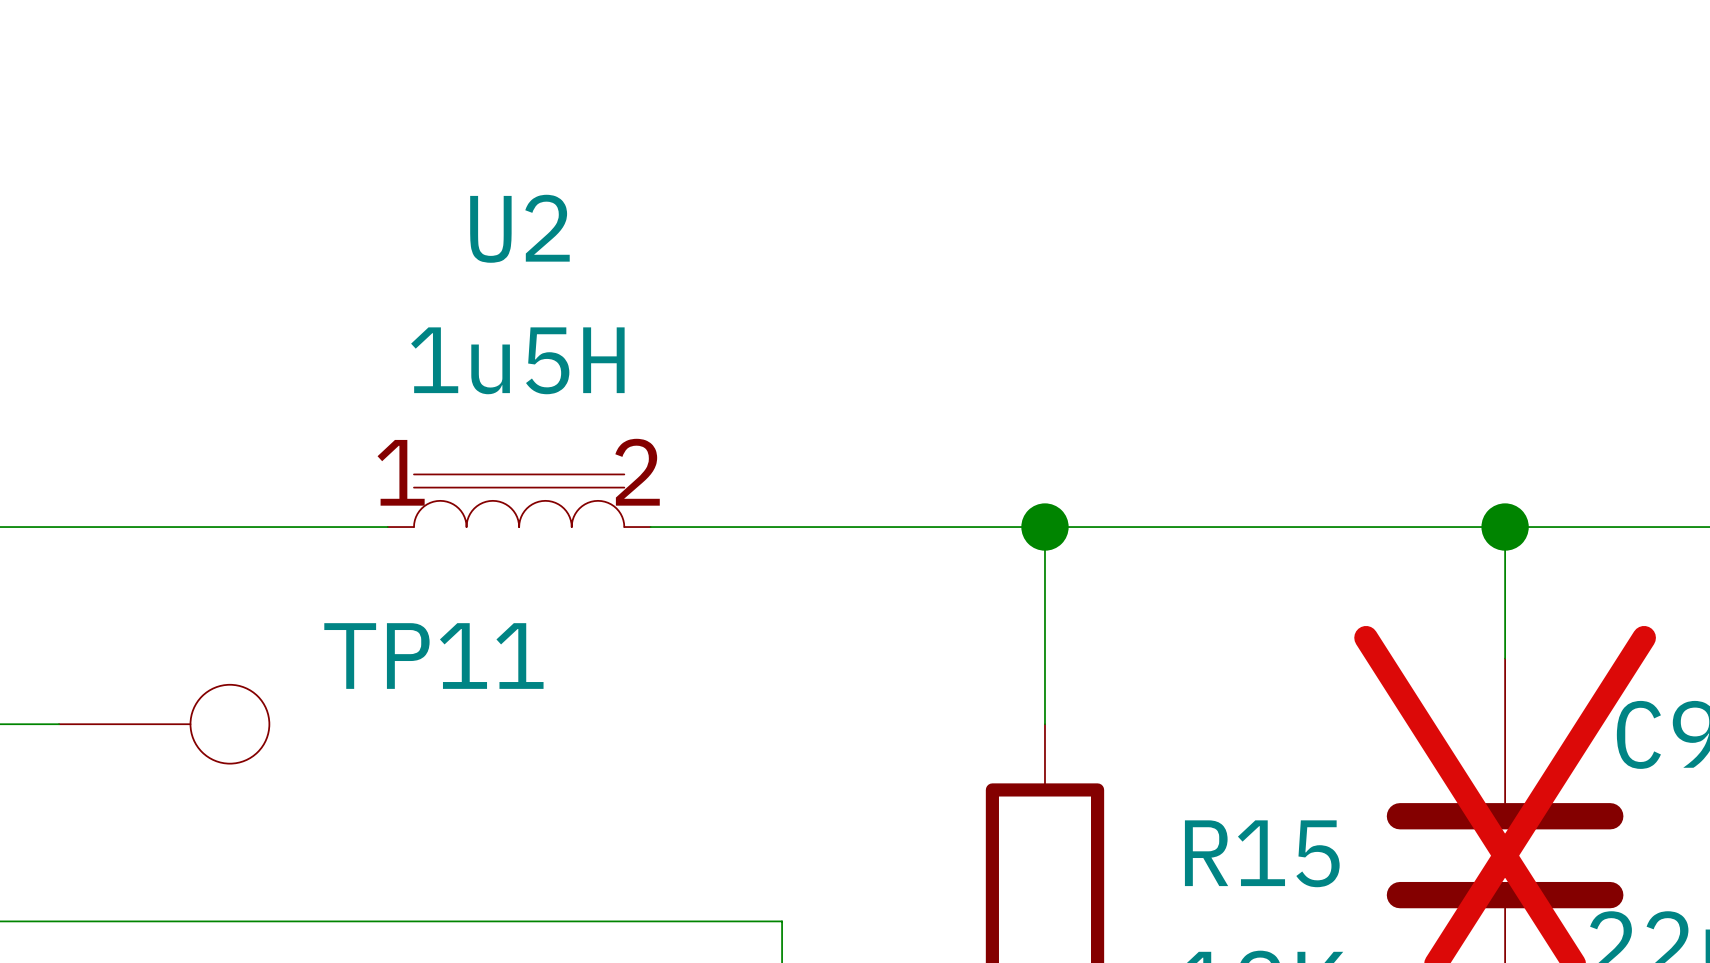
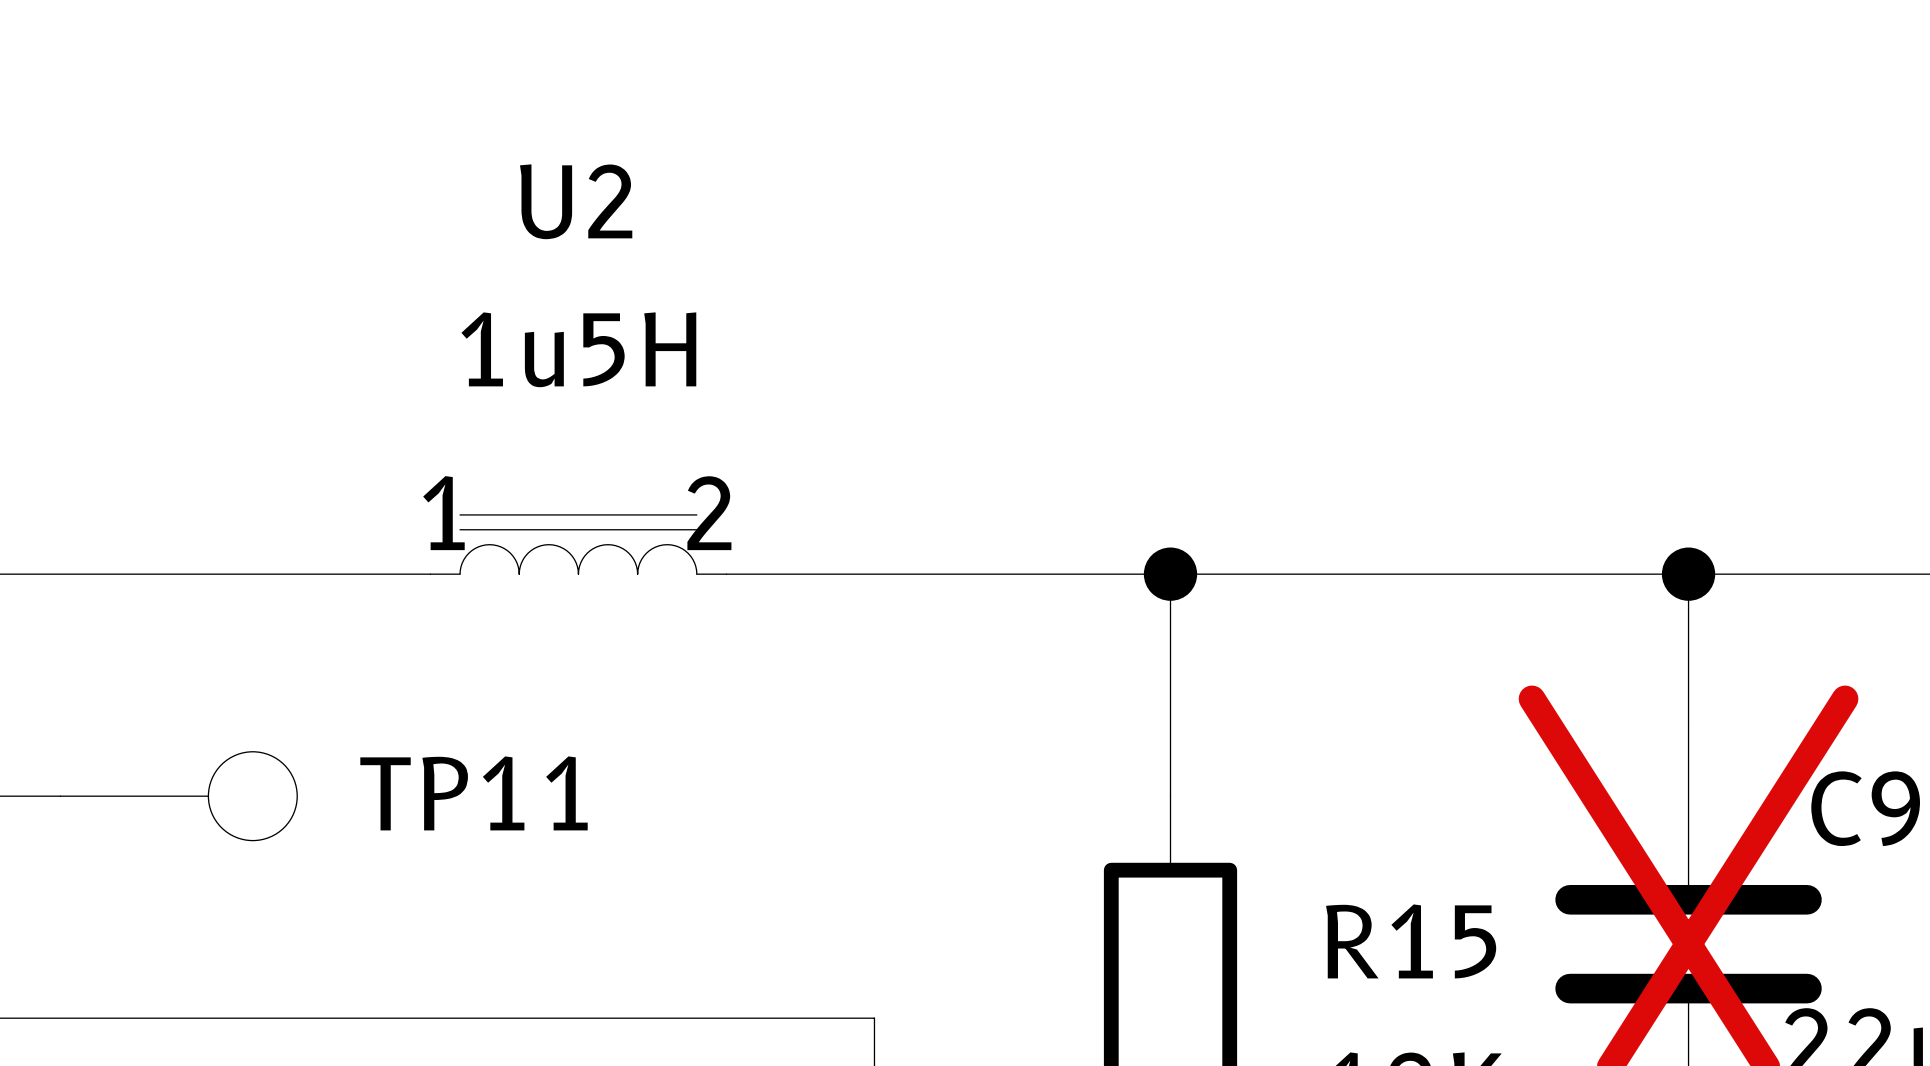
U2 name position: U2 (519, 228) -> U2 (576, 201)
U2 value position: 1u5H (517, 360) -> 1u5H (578, 349)
TP11 name position: TP11 (433, 656) -> TP11 (474, 793)

